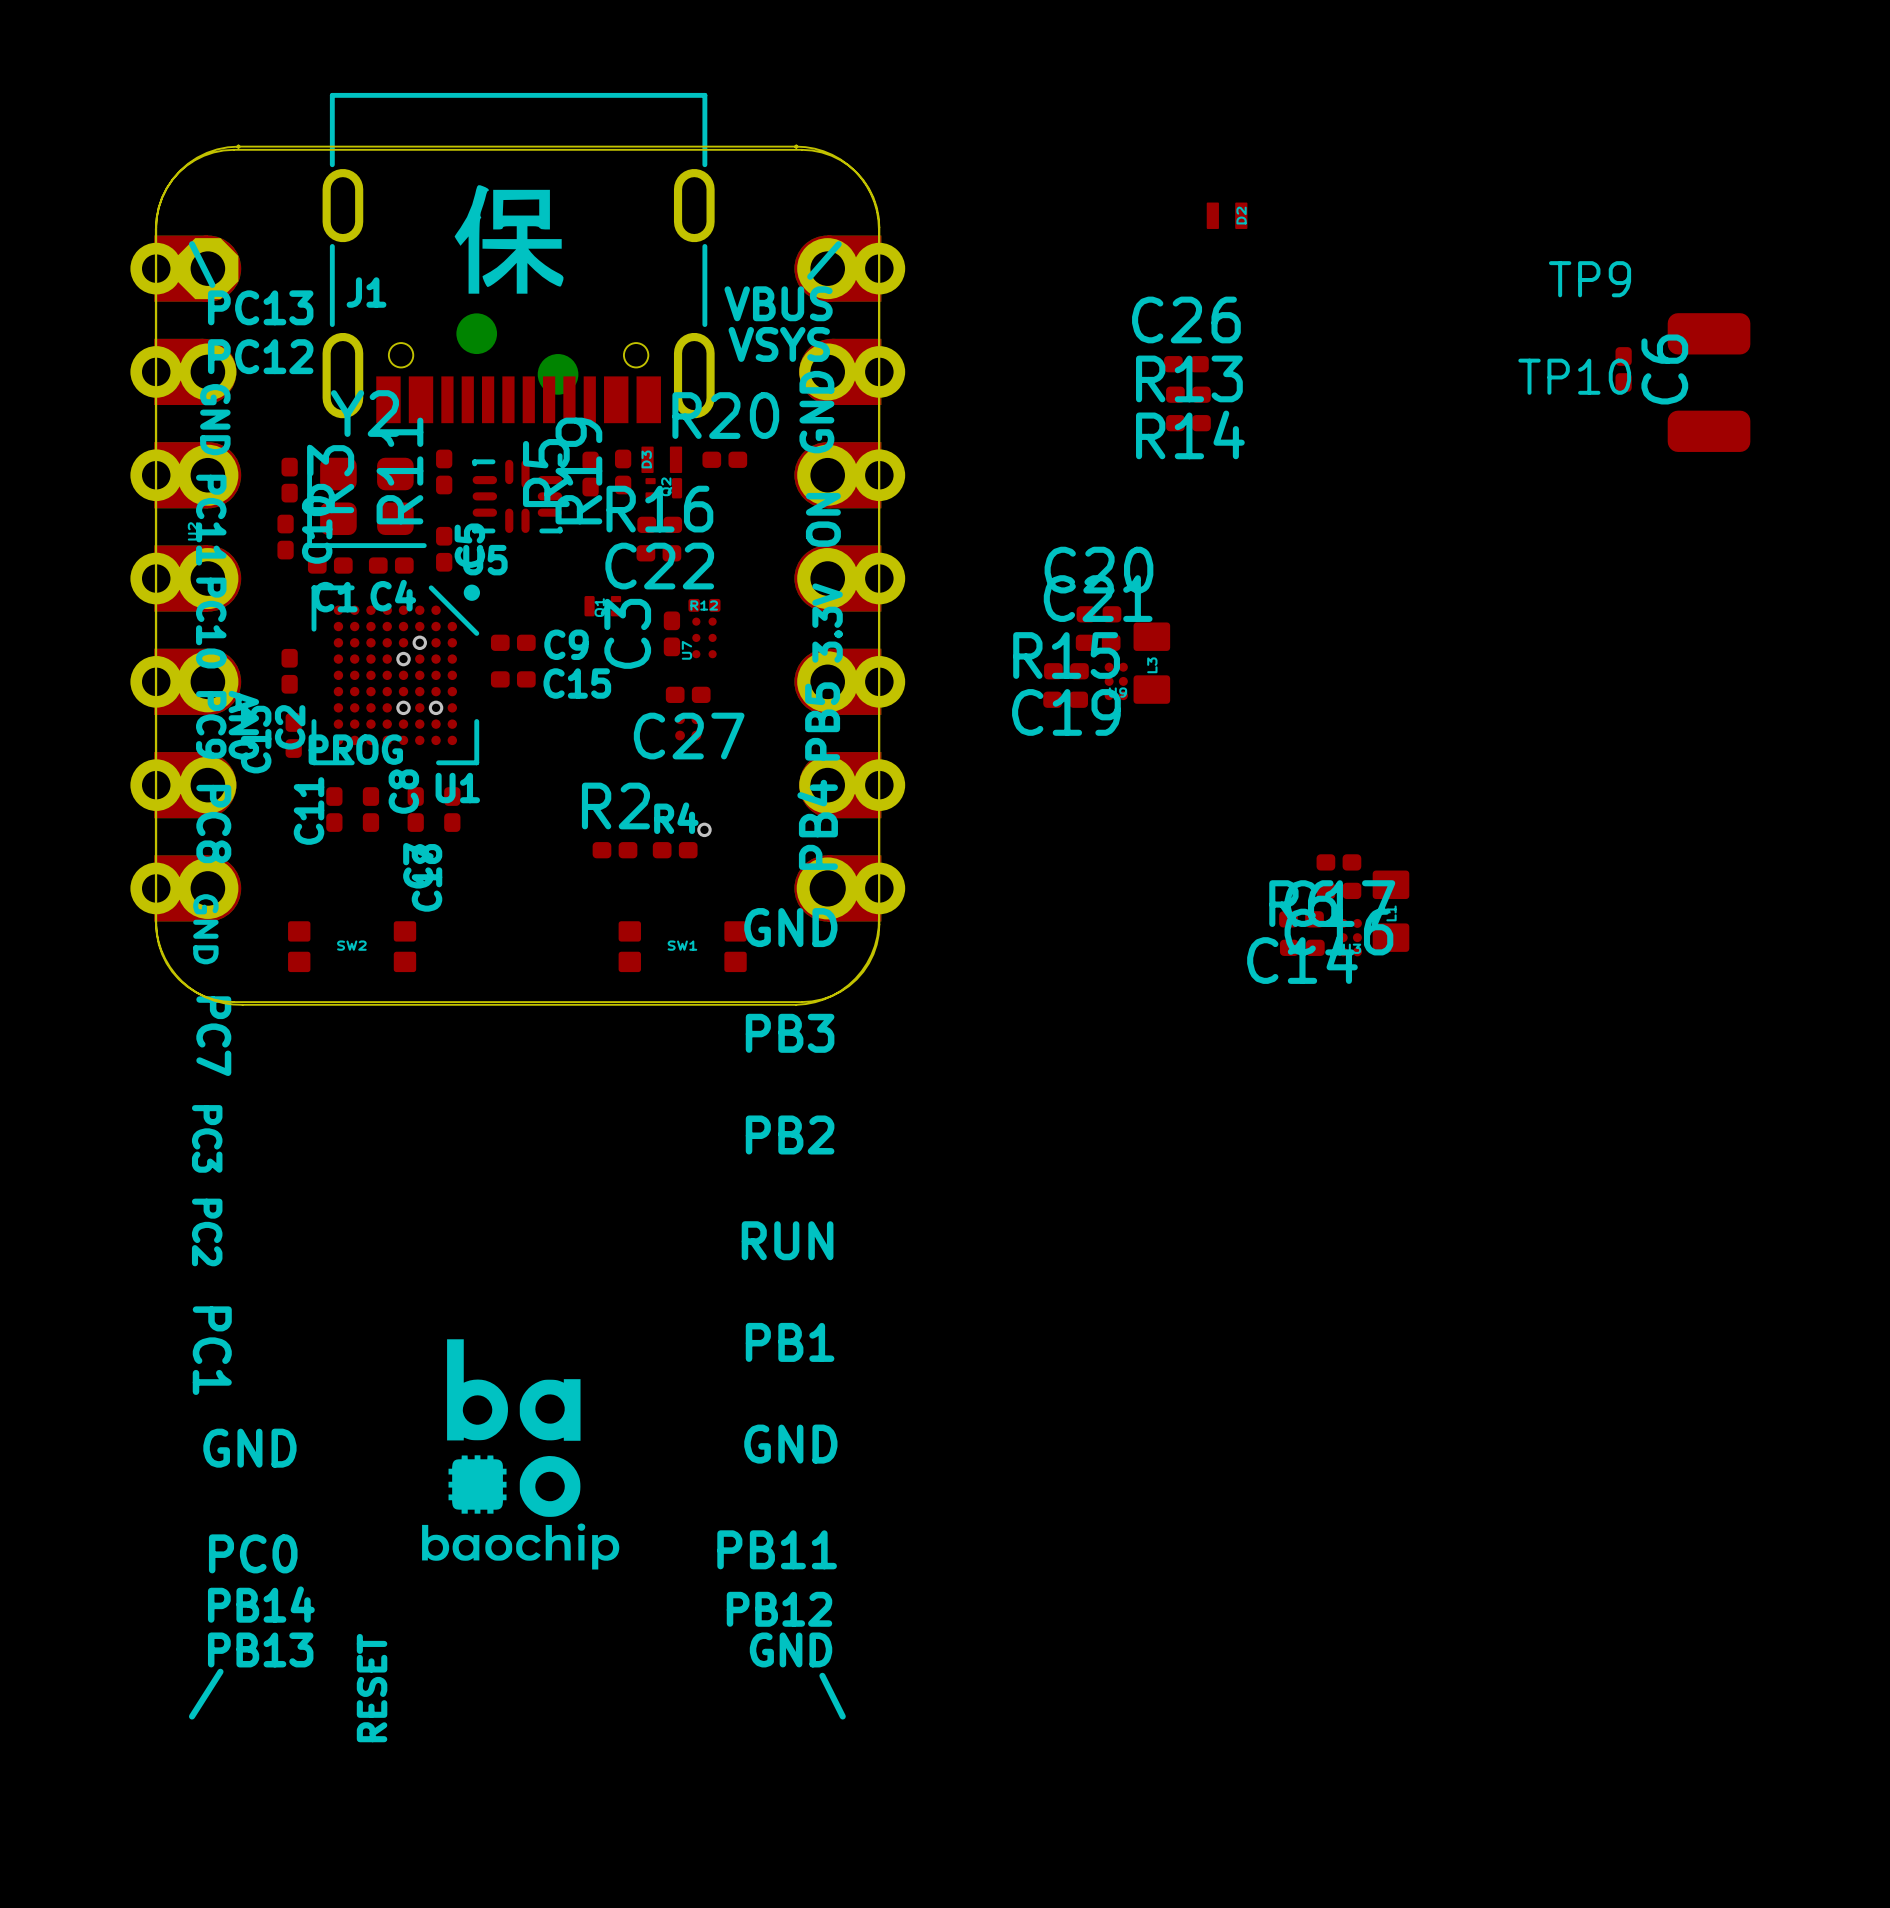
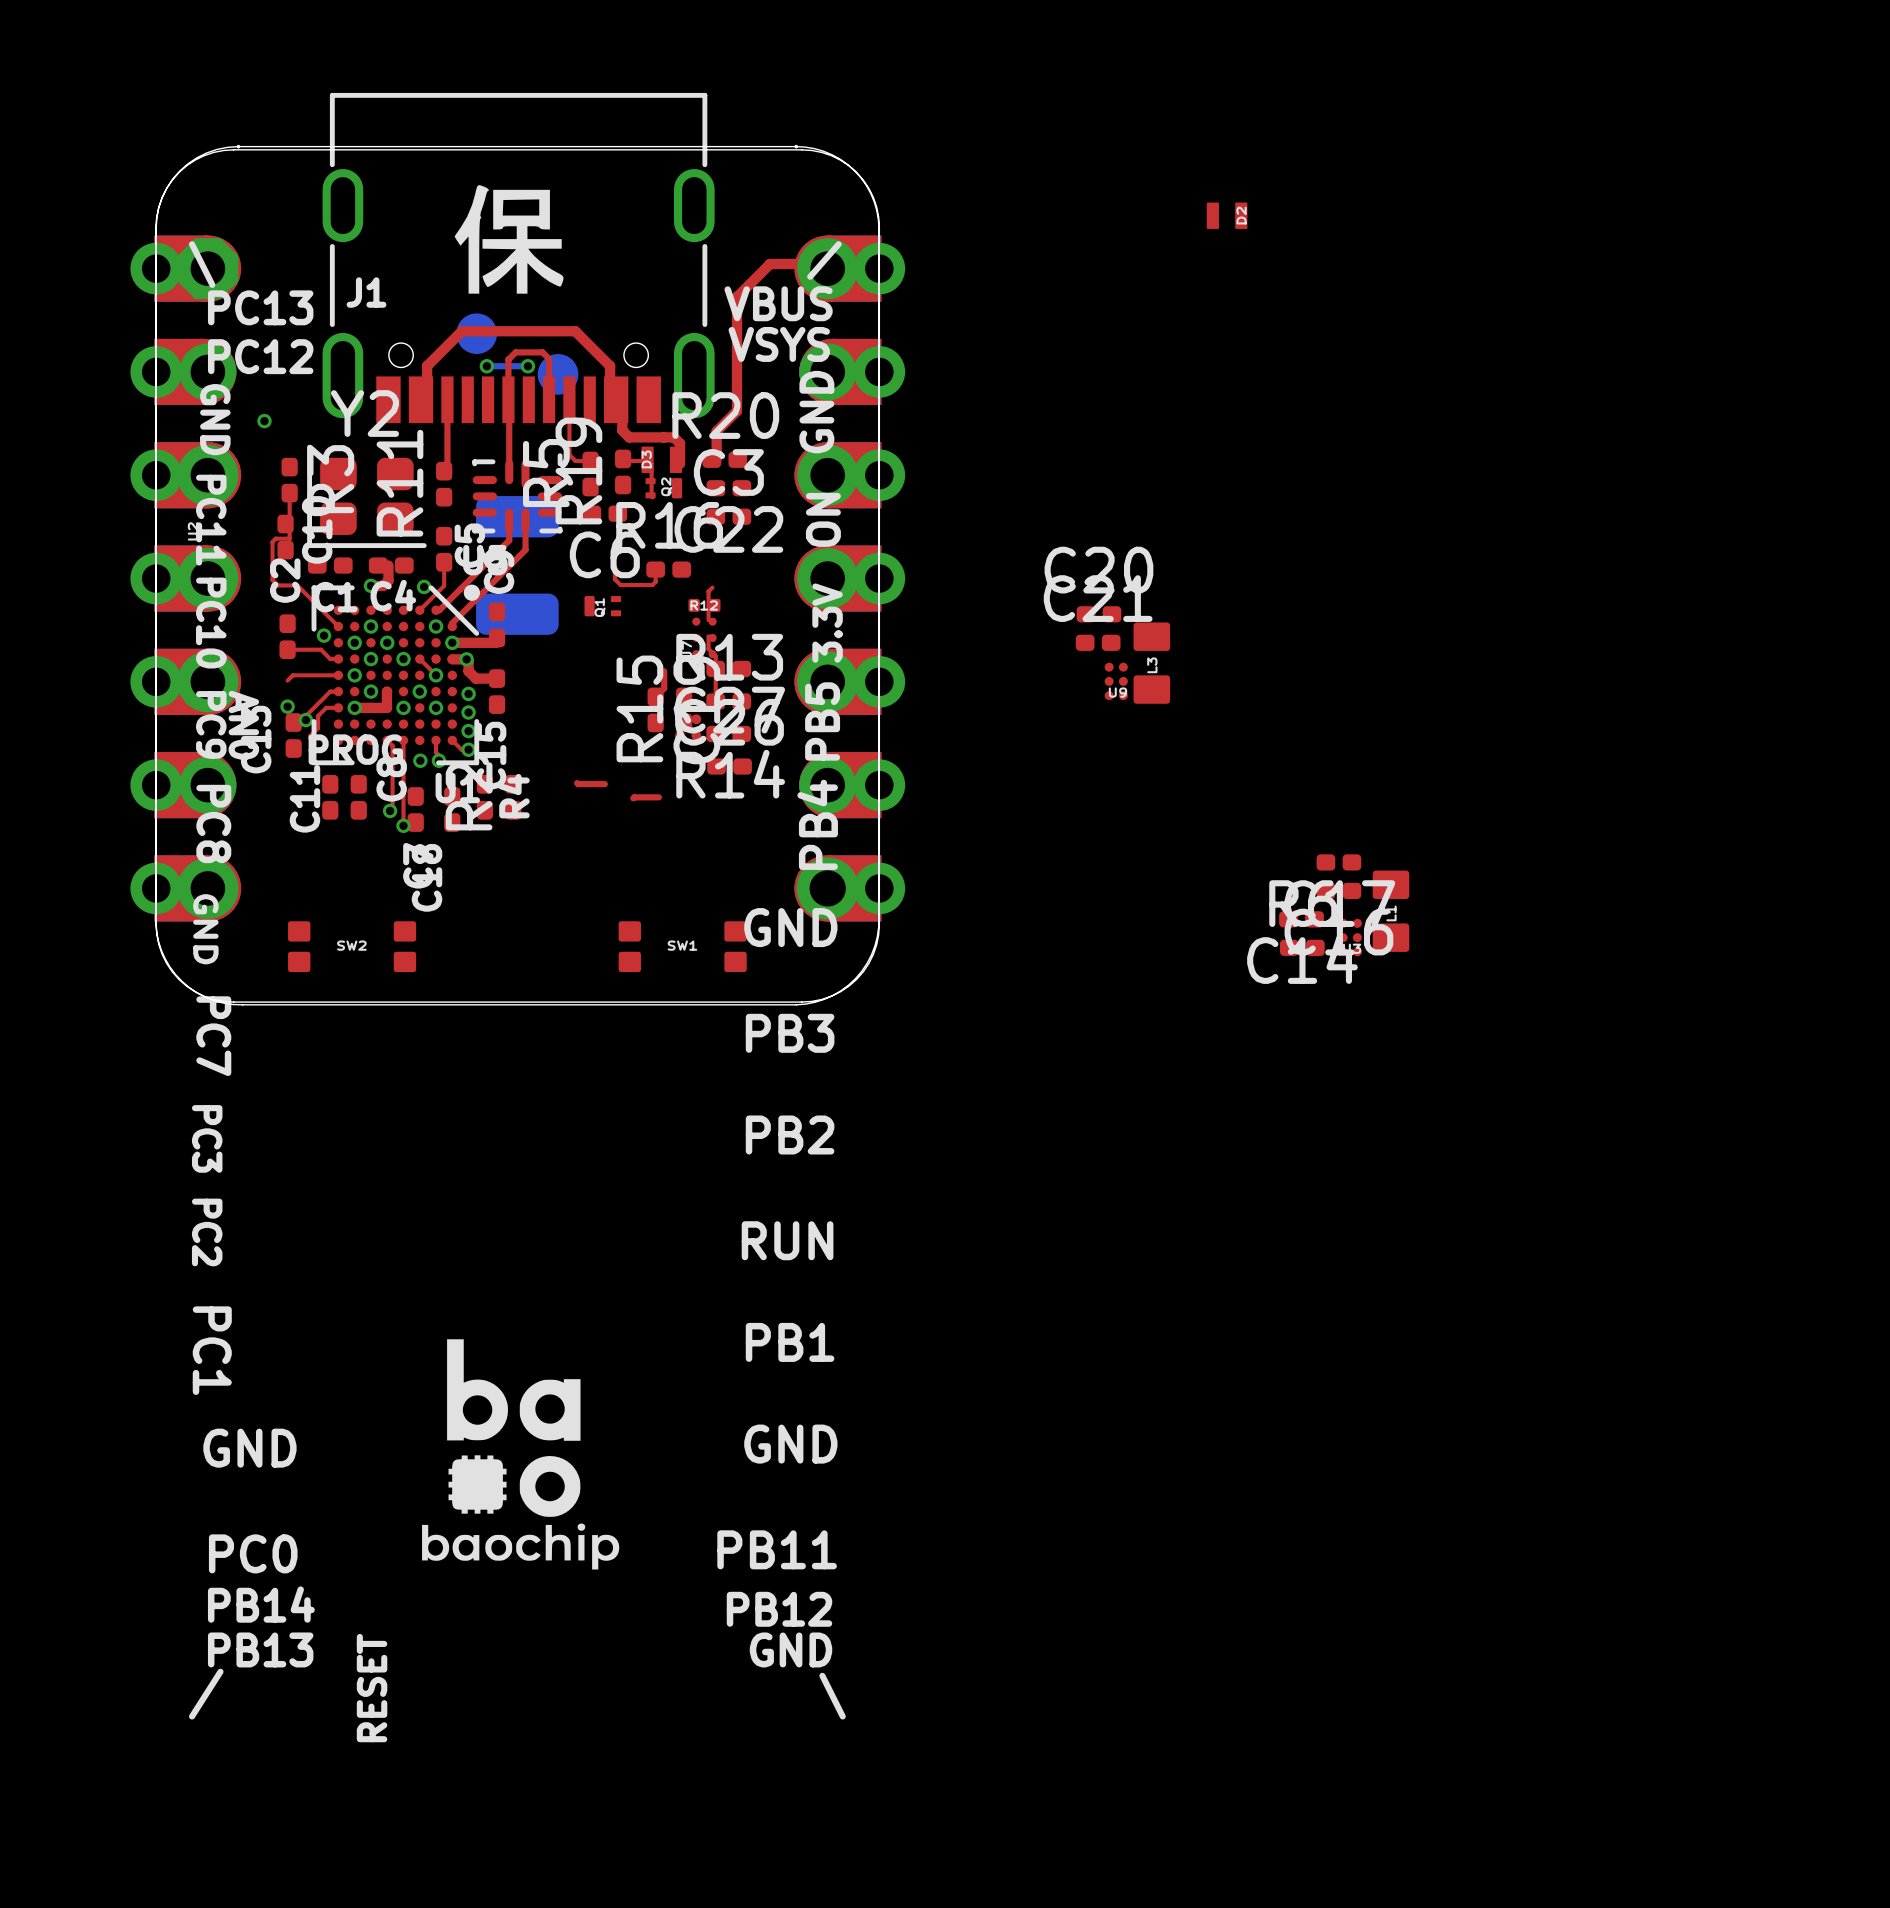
top track: none -> (827, 263) (770, 263) (737, 297) (737, 410) (716, 431) (716, 459)
TP9: (1709, 333) -> none
C26 position: (1186, 364) -> (729, 766)
bottom track: none -> (486, 366) (527, 366)
via: none -> (486, 366)
via: none -> (527, 366)
C6 rotation: 0° (1623, 369) -> 90° clockwise (604, 513)
C6 position: (1623, 369) -> (604, 513)
R14 position: (1188, 394) -> (728, 733)
top track: none -> (427, 399) (427, 366) (461, 331) (575, 331) (610, 366) (610, 399)
top track: none -> (447, 399) (447, 467) (444, 471)
top track: none -> (549, 399) (549, 358) (542, 352) (515, 352) (508, 359) (509, 471)
top track: none -> (569, 399) (569, 454) (575, 460) (590, 460)
top track: none -> (622, 399) (622, 430) (629, 437) (673, 437) (680, 443) (680, 463)
via: none -> (264, 421)
R13 position: (1188, 423) -> (728, 701)
TP10: (1709, 431) -> none
top track: none -> (623, 460) (648, 460) (651, 463) (652, 497)
R11 position: (444, 471) -> (444, 484)
top track: none -> (289, 493) (289, 538) (275, 538) (272, 541) (272, 580) (277, 585) (297, 585) (338, 626)
part: none -> (517, 516)
top track: none -> (509, 520) (509, 540) (439, 610) (436, 610)
top track: none -> (525, 520) (525, 549) (452, 623) (452, 626)
C22 position: (659, 524) -> (728, 488)
R16 position: (658, 553) -> (668, 569)
top track: none -> (444, 562) (444, 585) (419, 610)
top track: none -> (388, 565) (388, 580) (383, 585) (370, 585)
top track: none -> (614, 566) (614, 579) (620, 585) (652, 585) (655, 581) (655, 569)
via: none -> (370, 585)
via: none -> (424, 586)
top track: none -> (712, 587) (708, 591) (708, 620)
part: none -> (517, 614)
via: none -> (370, 626)
via: none -> (436, 626)
C3 rotation: 0° (671, 633) -> 90° clockwise (728, 516)
C3 position: (671, 633) -> (728, 516)
via: none -> (324, 635)
top track: none -> (708, 636) (708, 648) (715, 656) (715, 701)
via: none -> (354, 642)
via: none -> (387, 642)
via: (419, 642) -> none
top track: none -> (452, 642) (497, 642)
via: none -> (452, 642)
C9 rotation: 0° (513, 642) -> 90° clockwise (497, 624)
top track: none -> (287, 649) (320, 649) (330, 659) (338, 659)
via: none -> (370, 659)
top track: none -> (419, 659) (436, 675)
top track: none -> (452, 659) (466, 659) (468, 661) (468, 671) (475, 678) (497, 678)
via: none -> (466, 659)
C2 position: (289, 671) -> (287, 636)
top track: none -> (664, 671) (664, 688) (655, 696)
C19 rotation: 0° (1066, 671) -> 90° clockwise (655, 709)
C19 position: (1066, 671) -> (655, 709)
top track: none -> (338, 675) (292, 675) (287, 680)
via: none -> (354, 675)
via: none -> (436, 675)
C15 rotation: 0° (513, 679) -> 90° clockwise (497, 691)
top track: none -> (338, 691) (330, 691) (304, 717) (304, 720)
via: none -> (370, 691)
top track: none -> (386, 691) (386, 707) (354, 707)
via: none -> (419, 691)
via: none -> (468, 693)
C27 position: (688, 694) -> (728, 668)
R15 rotation: 0° (1065, 699) -> 90° clockwise (684, 709)
R15 position: (1065, 699) -> (684, 709)
via: none -> (287, 706)
top track: none -> (338, 707) (326, 707) (318, 716) (318, 728) (309, 737)
via: none -> (354, 707)
via: none -> (468, 712)
via: none -> (305, 720)
C2 name position: C2 (290, 727) -> C2 (285, 580)
via: none -> (468, 731)
top track: none -> (387, 740) (392, 745) (392, 808) (390, 810) (392, 813)
top track: none -> (403, 740) (403, 824)
top track: none -> (436, 740) (436, 752) (438, 755) (438, 760)
top track: none -> (452, 740) (461, 749) (468, 749)
via: none -> (468, 749)
via: none -> (420, 760)
via: none -> (438, 760)
top track: none -> (577, 783) (604, 784)
top track: none -> (658, 797) (633, 798)
C11 position: (334, 809) -> (330, 797)
C8 position: (370, 809) -> (358, 797)
via: none -> (390, 810)
via: none -> (403, 825)
via: (704, 829) -> none
R2 rotation: 0° (614, 850) -> 90° clockwise (513, 797)
R2 position: (614, 850) -> (513, 797)
R4 rotation: 0° (675, 850) -> 90° clockwise (484, 797)
R4 position: (675, 850) -> (484, 797)

